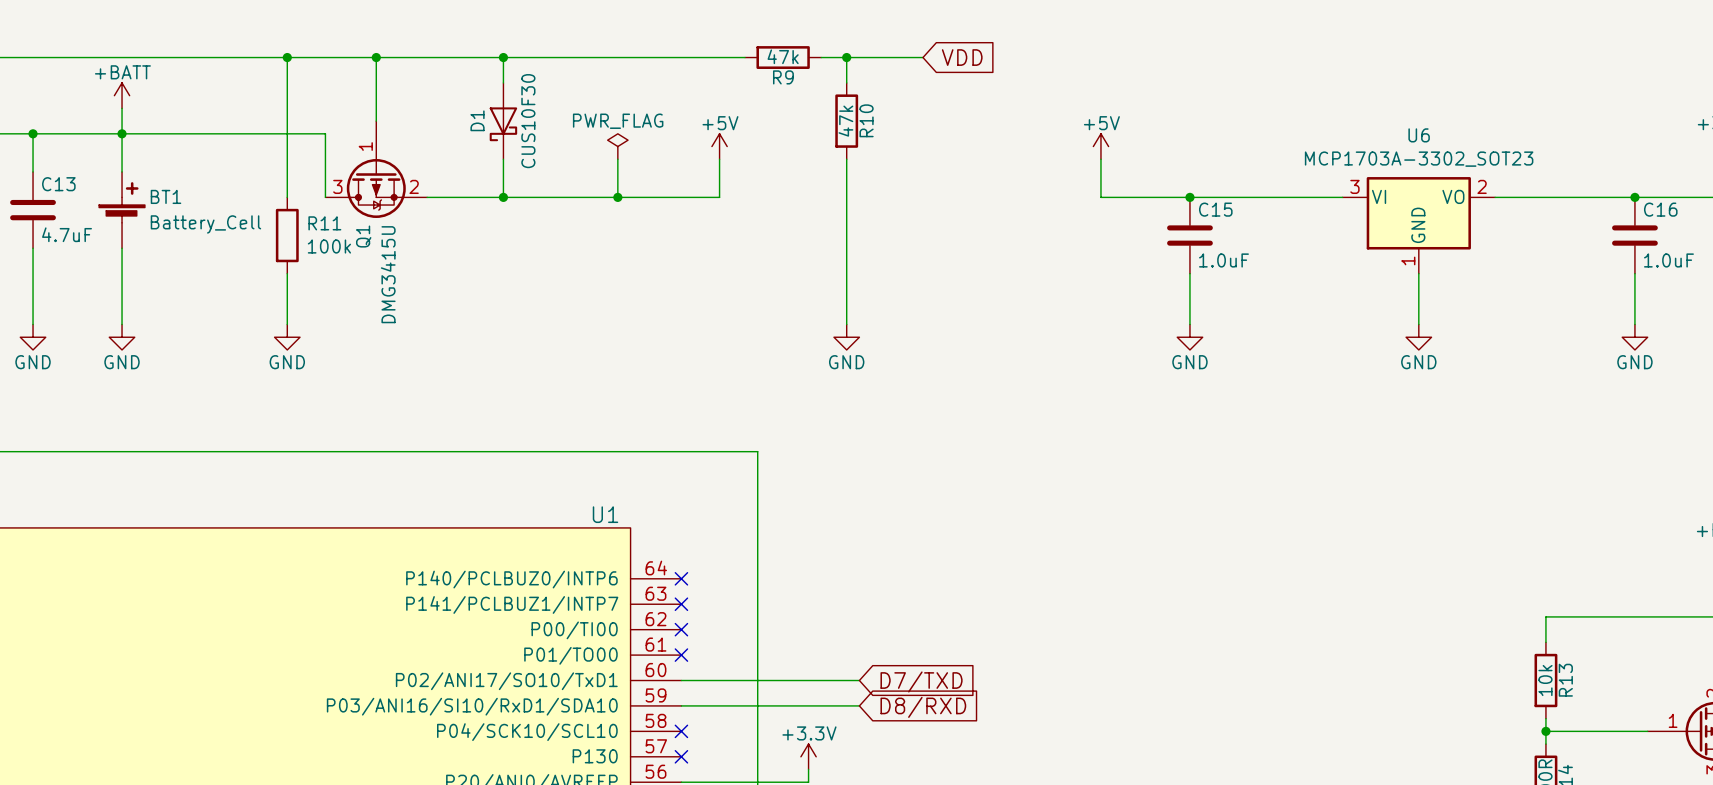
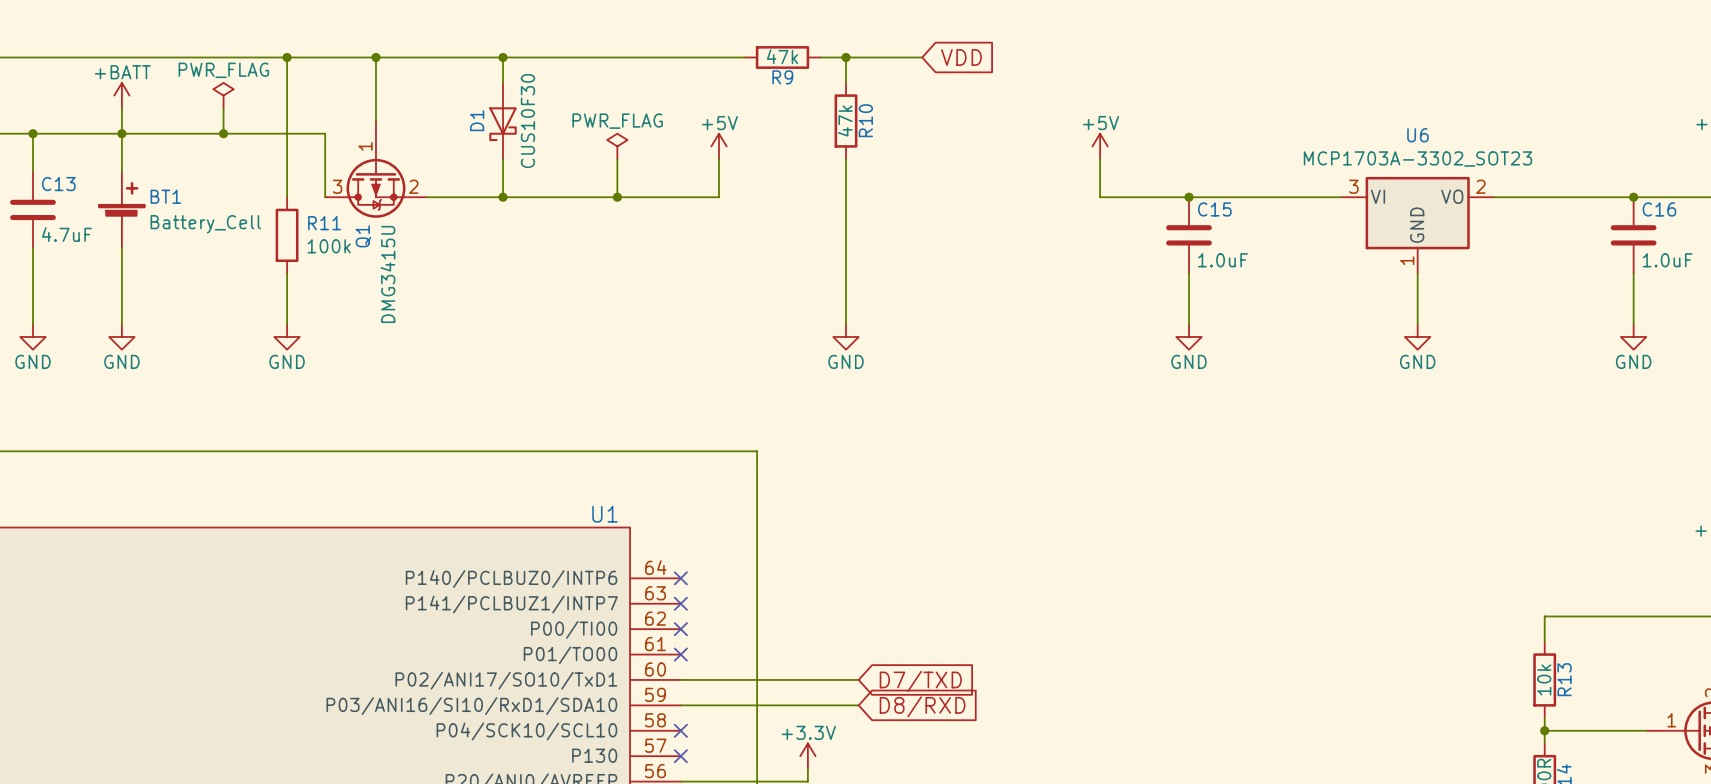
power symbol: none -> PWR_FLAG (223, 95)
wire: none -> (223, 108) (223, 133)
junction: none -> (223, 133)

